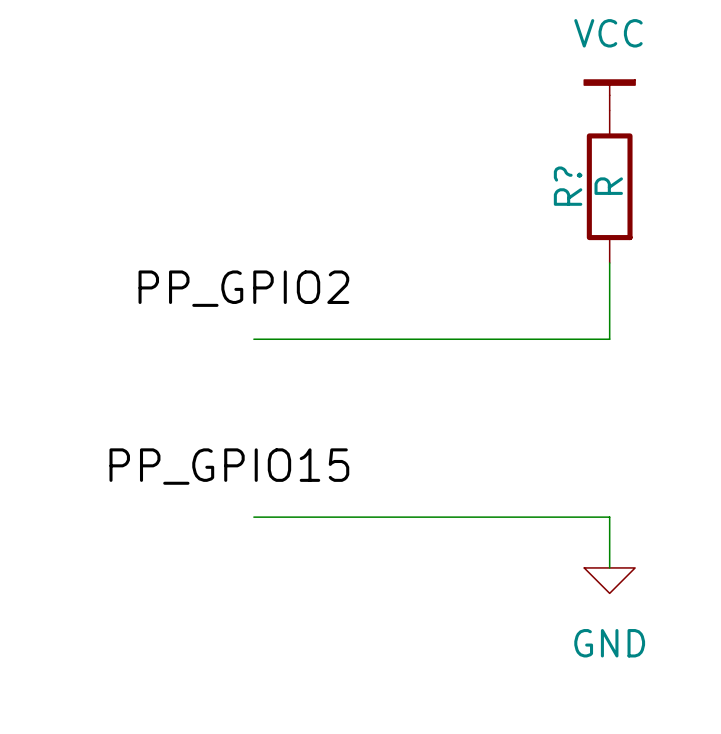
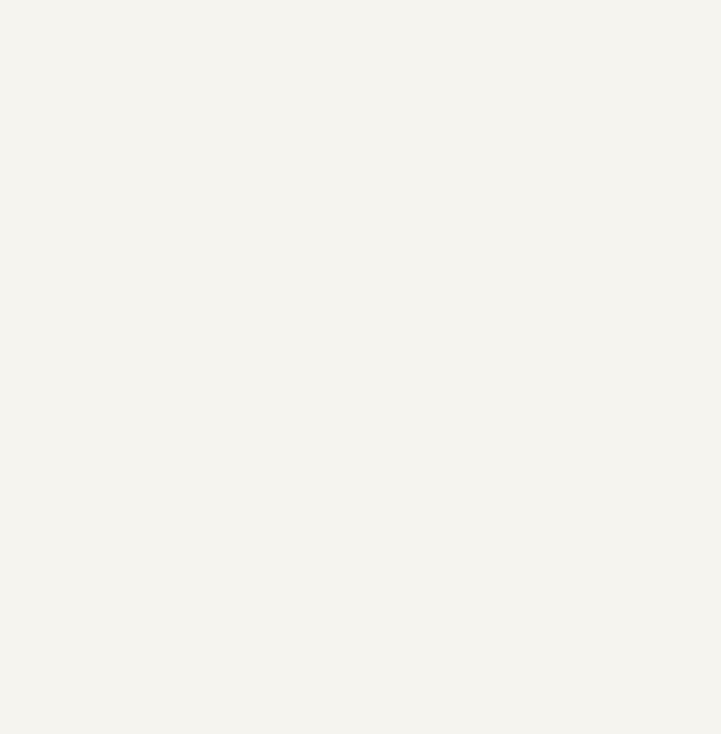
power symbol: VCC (609, 95) -> none
R?: R (609, 186) -> none
wire: (609, 262) (609, 339) (253, 339) -> none
label: PP_GPIO2 (243, 288) -> none
label: PP_GPIO15 (229, 466) -> none
wire: (253, 517) (609, 517) (609, 567) -> none
power symbol: GND (609, 580) -> none

